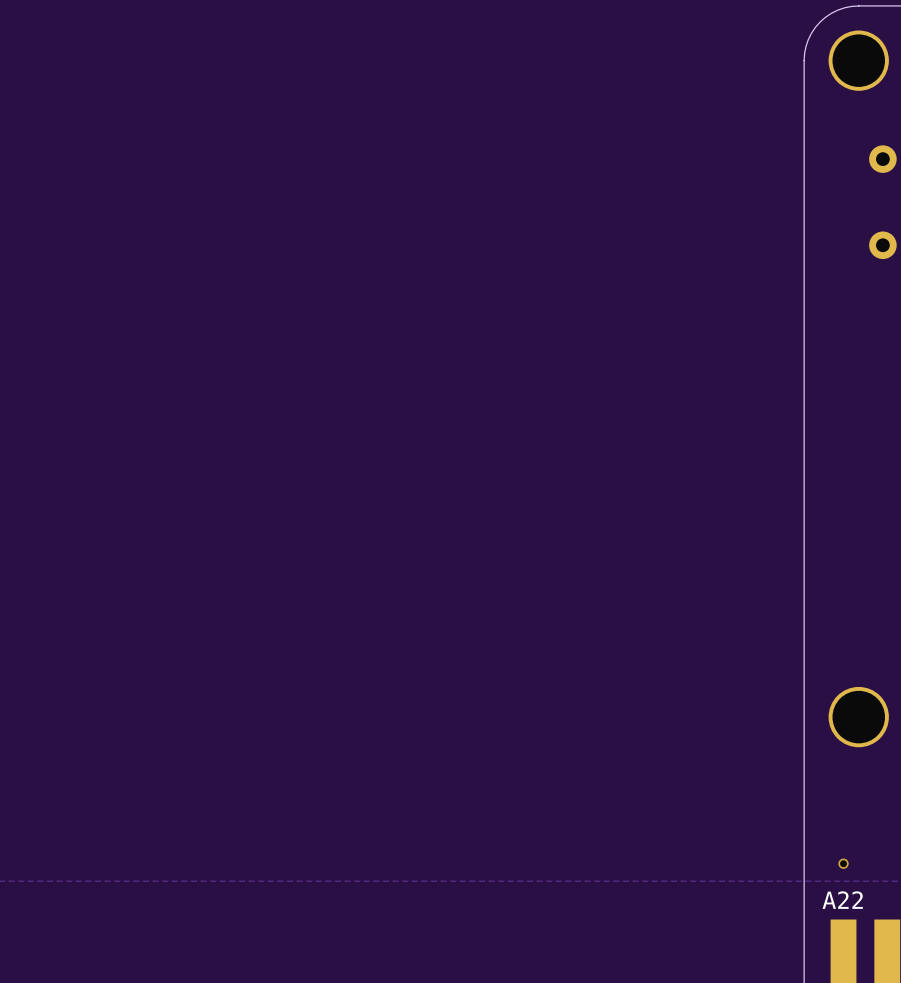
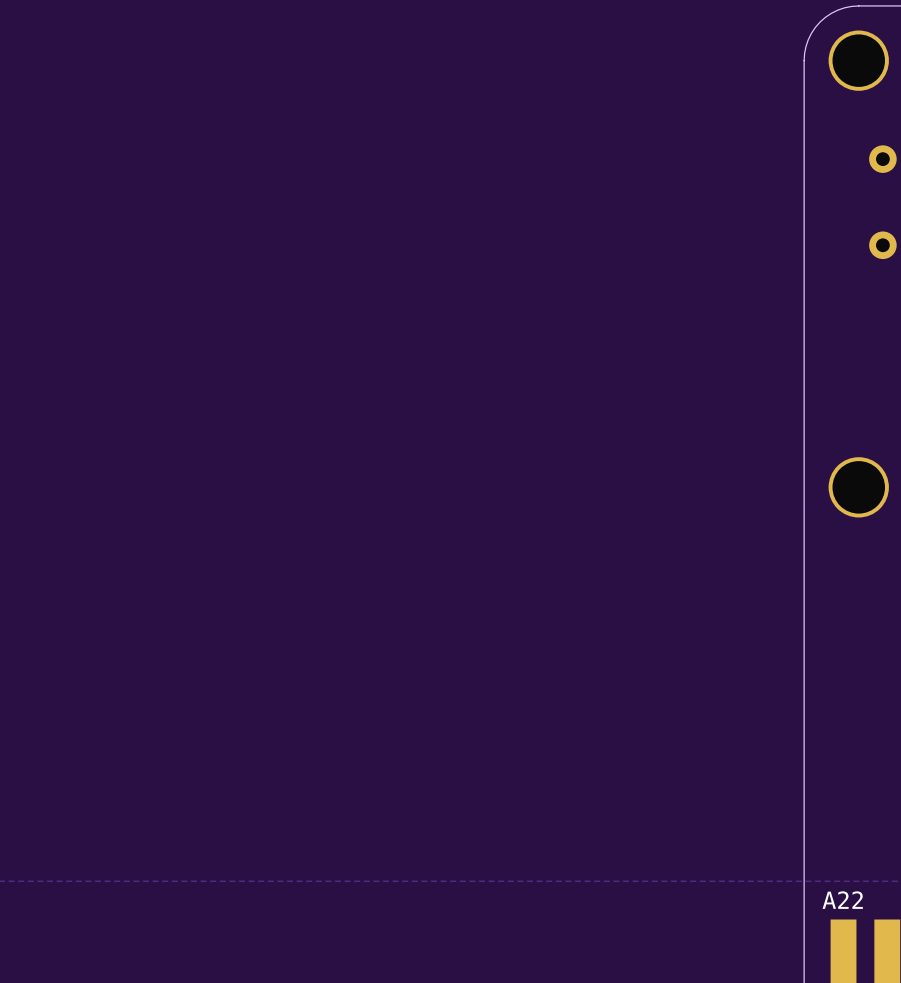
part position: (858, 717) -> (858, 487)
via: (843, 863) -> none

